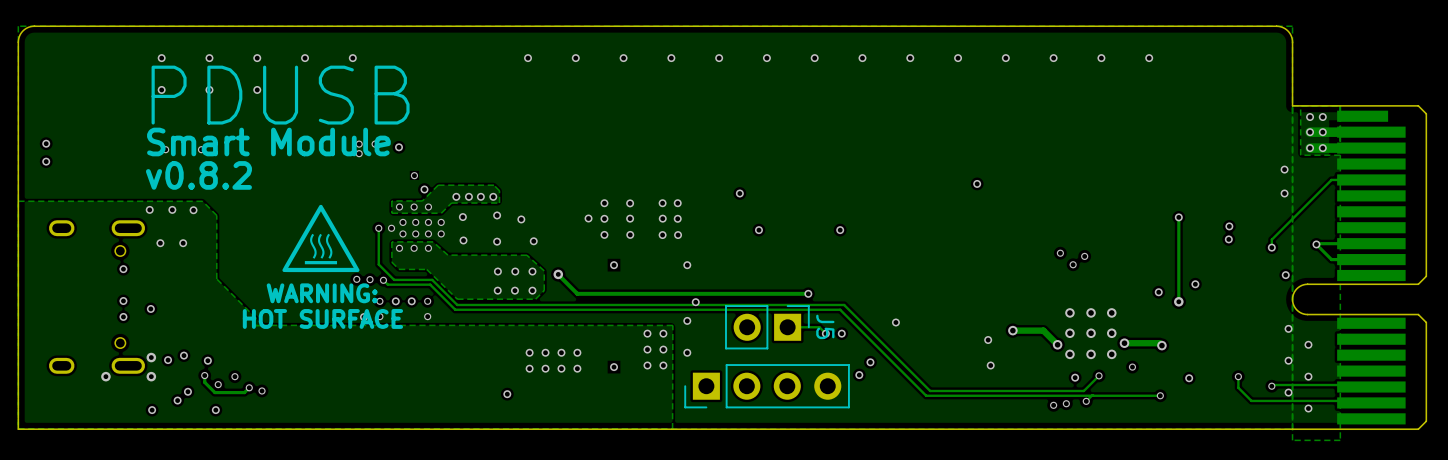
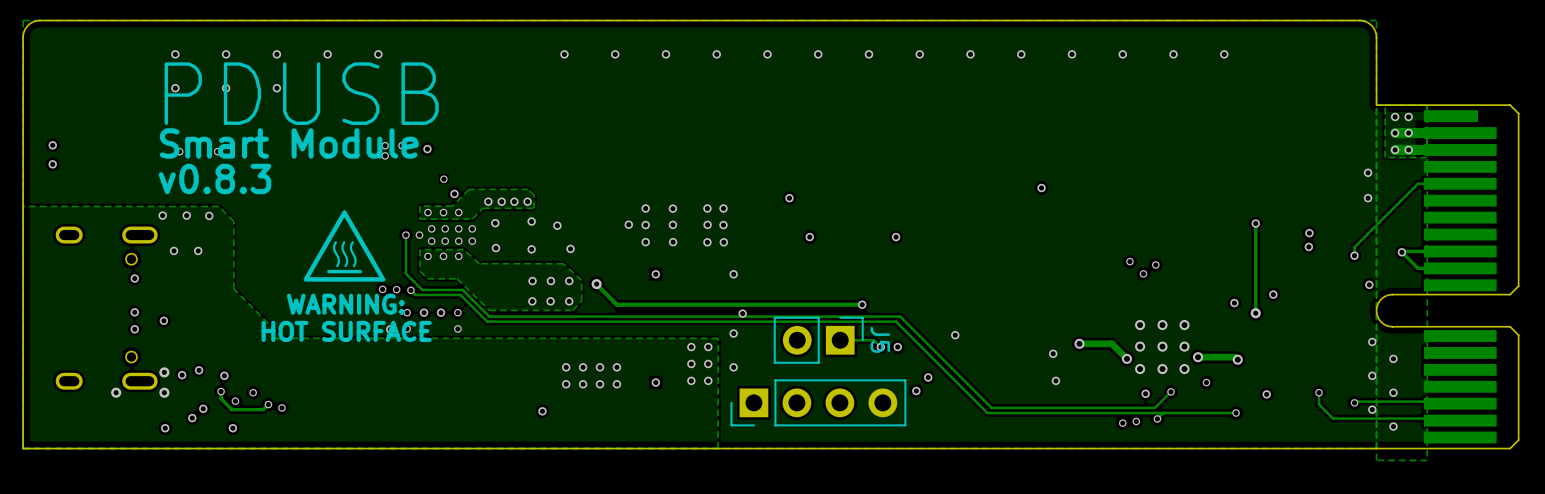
text: v0.8.2 (198, 175) -> v0.8.3 (214, 178)

